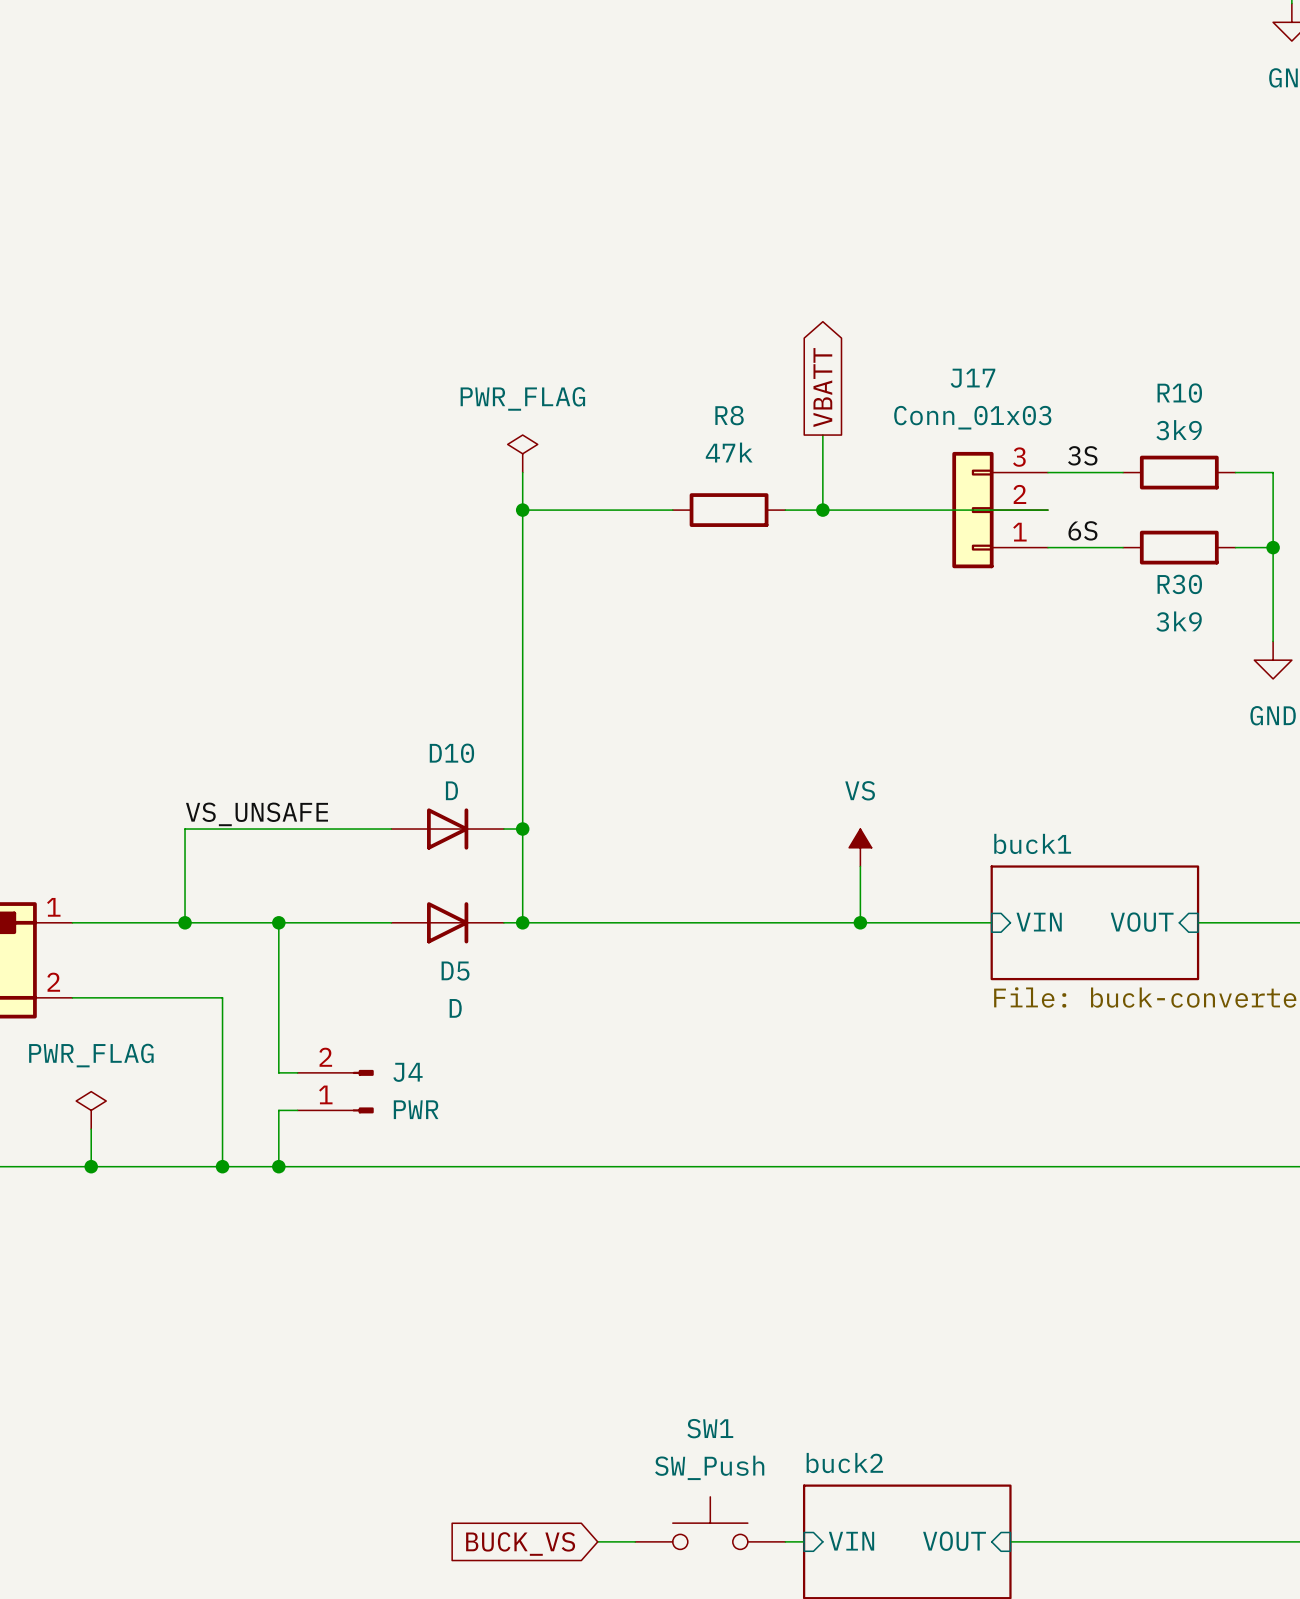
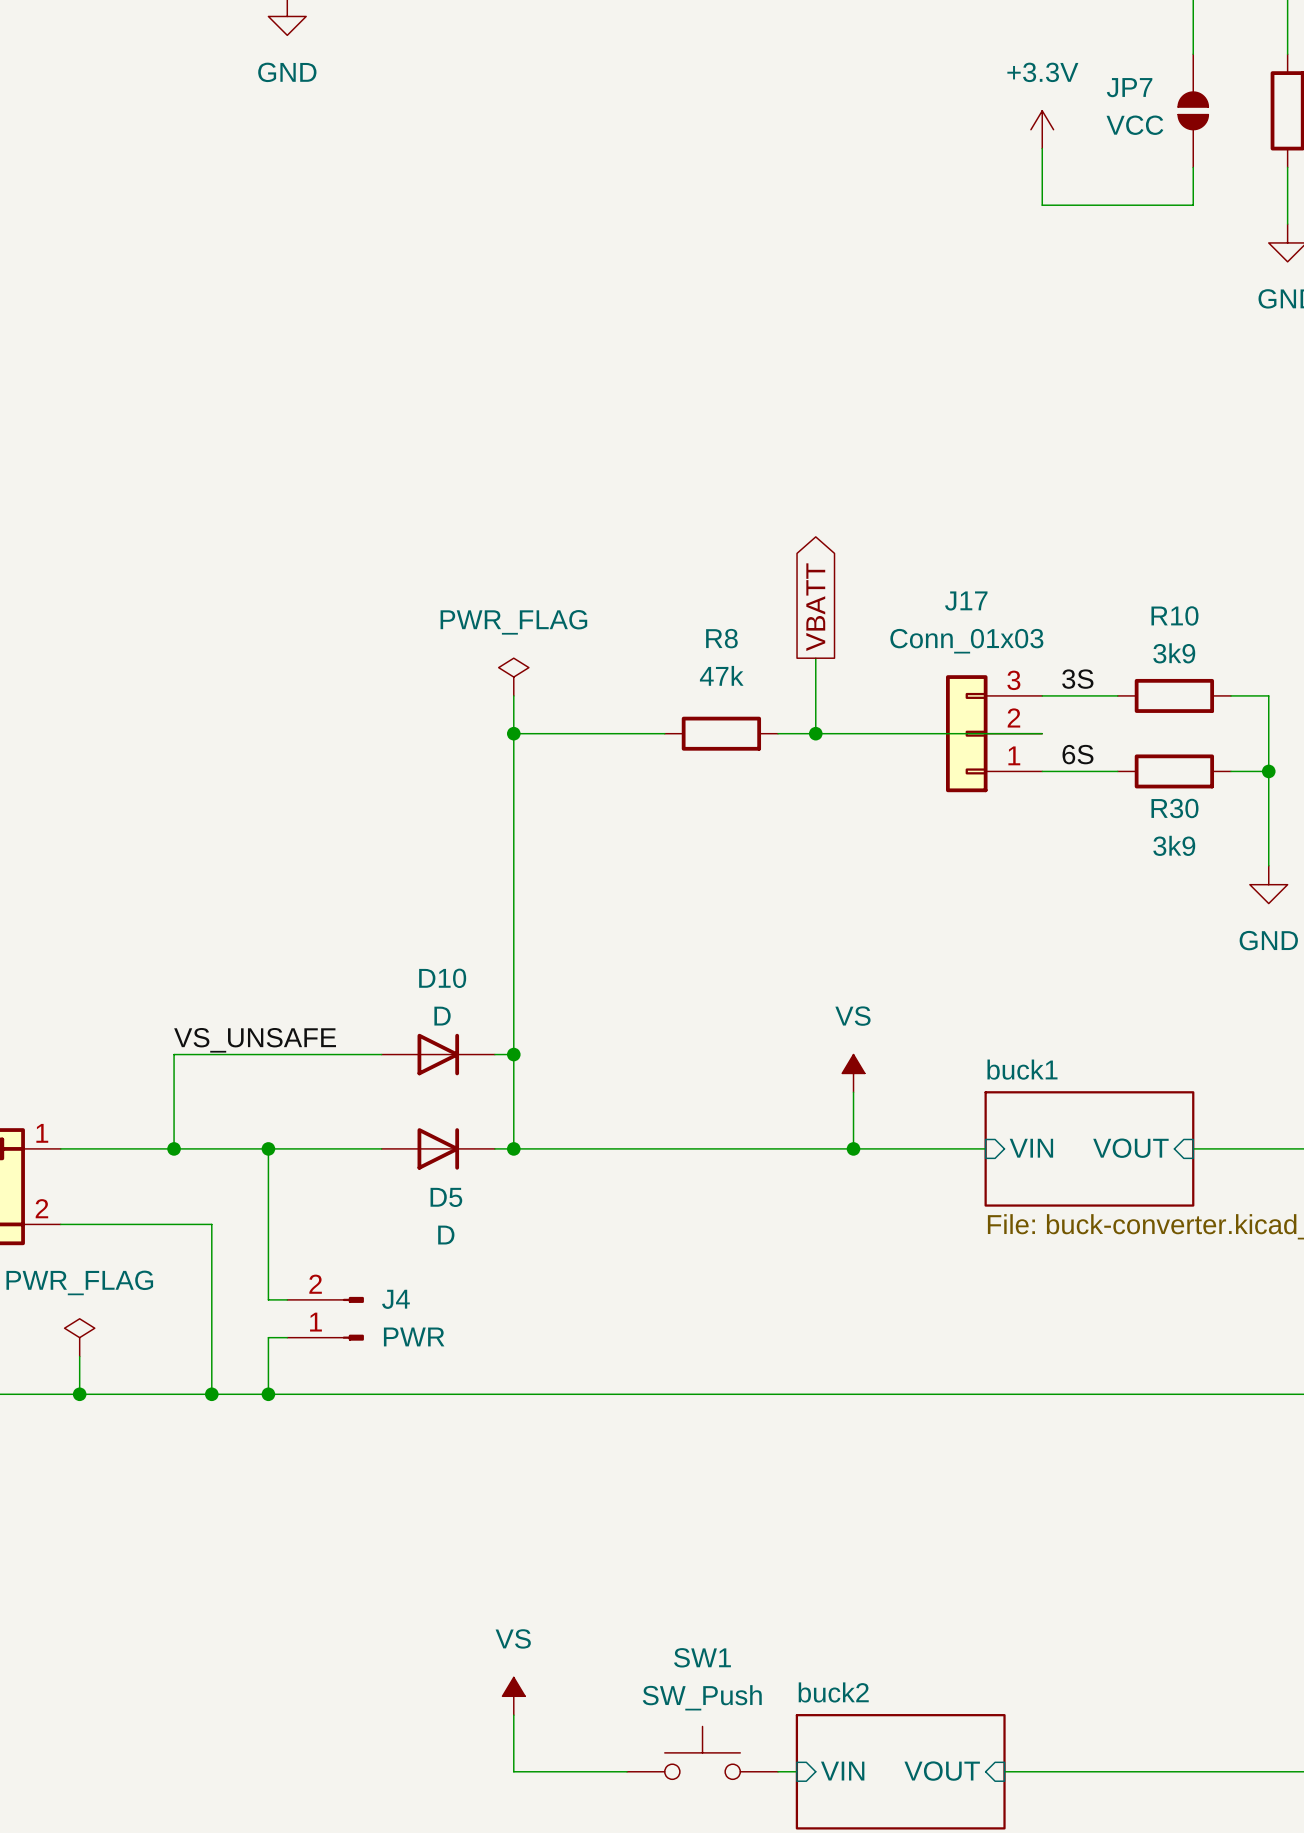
power symbol: none -> VS (513, 1696)
wire: none -> (513, 1715) (513, 1771) (589, 1771)
global label: BUCK_VS (520, 1544) -> none

